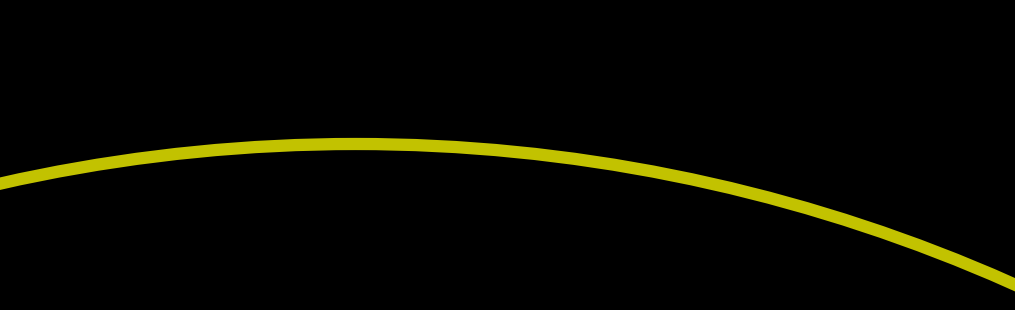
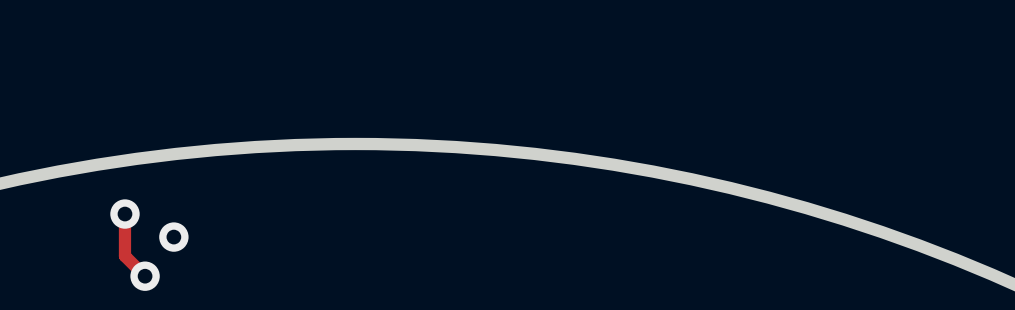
track: none -> (124, 214) (124, 256) (145, 276)
via: none -> (124, 214)
via: none -> (173, 237)
via: none -> (145, 276)

